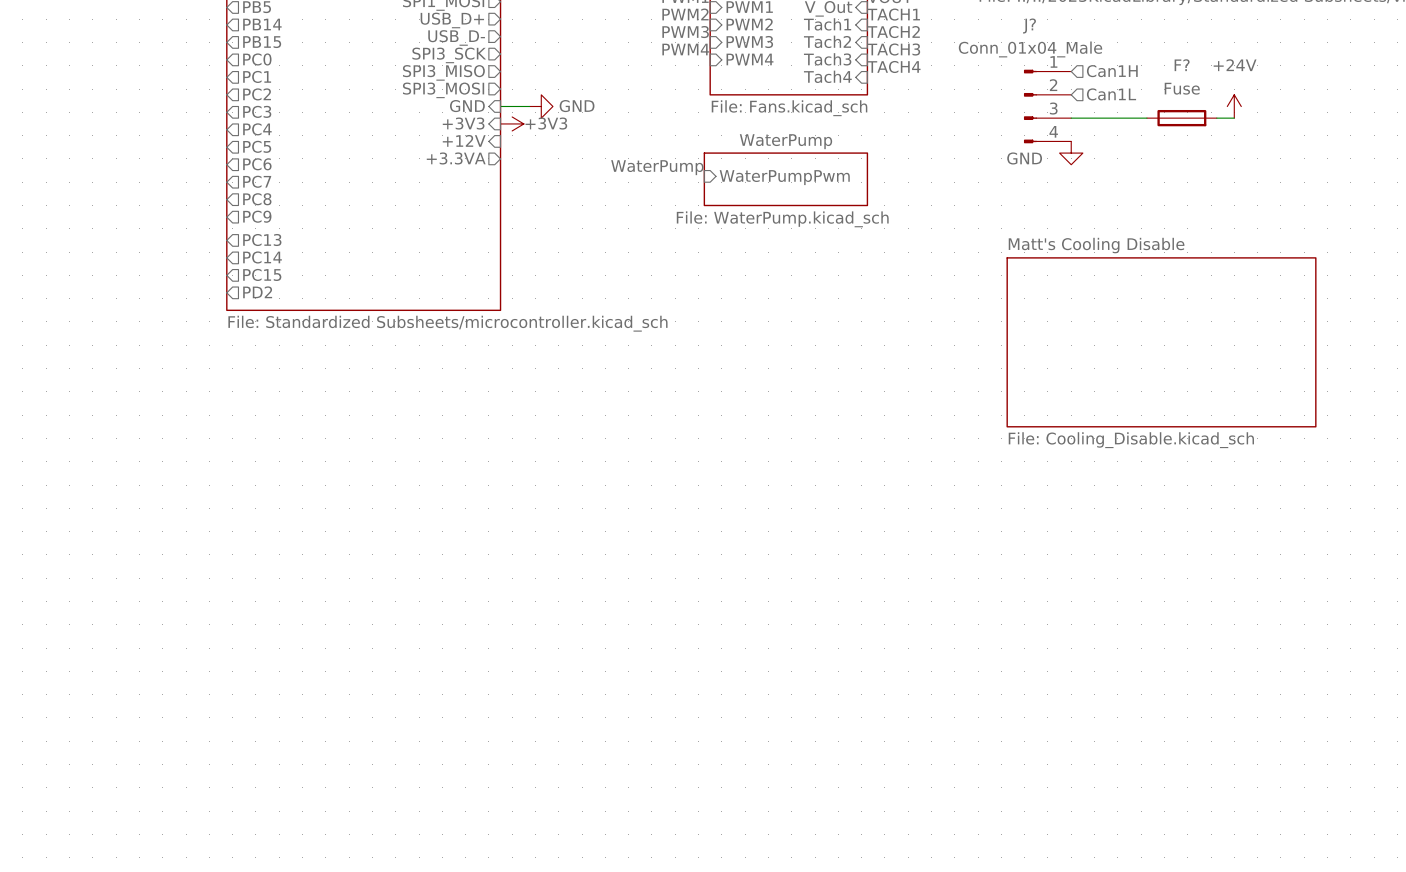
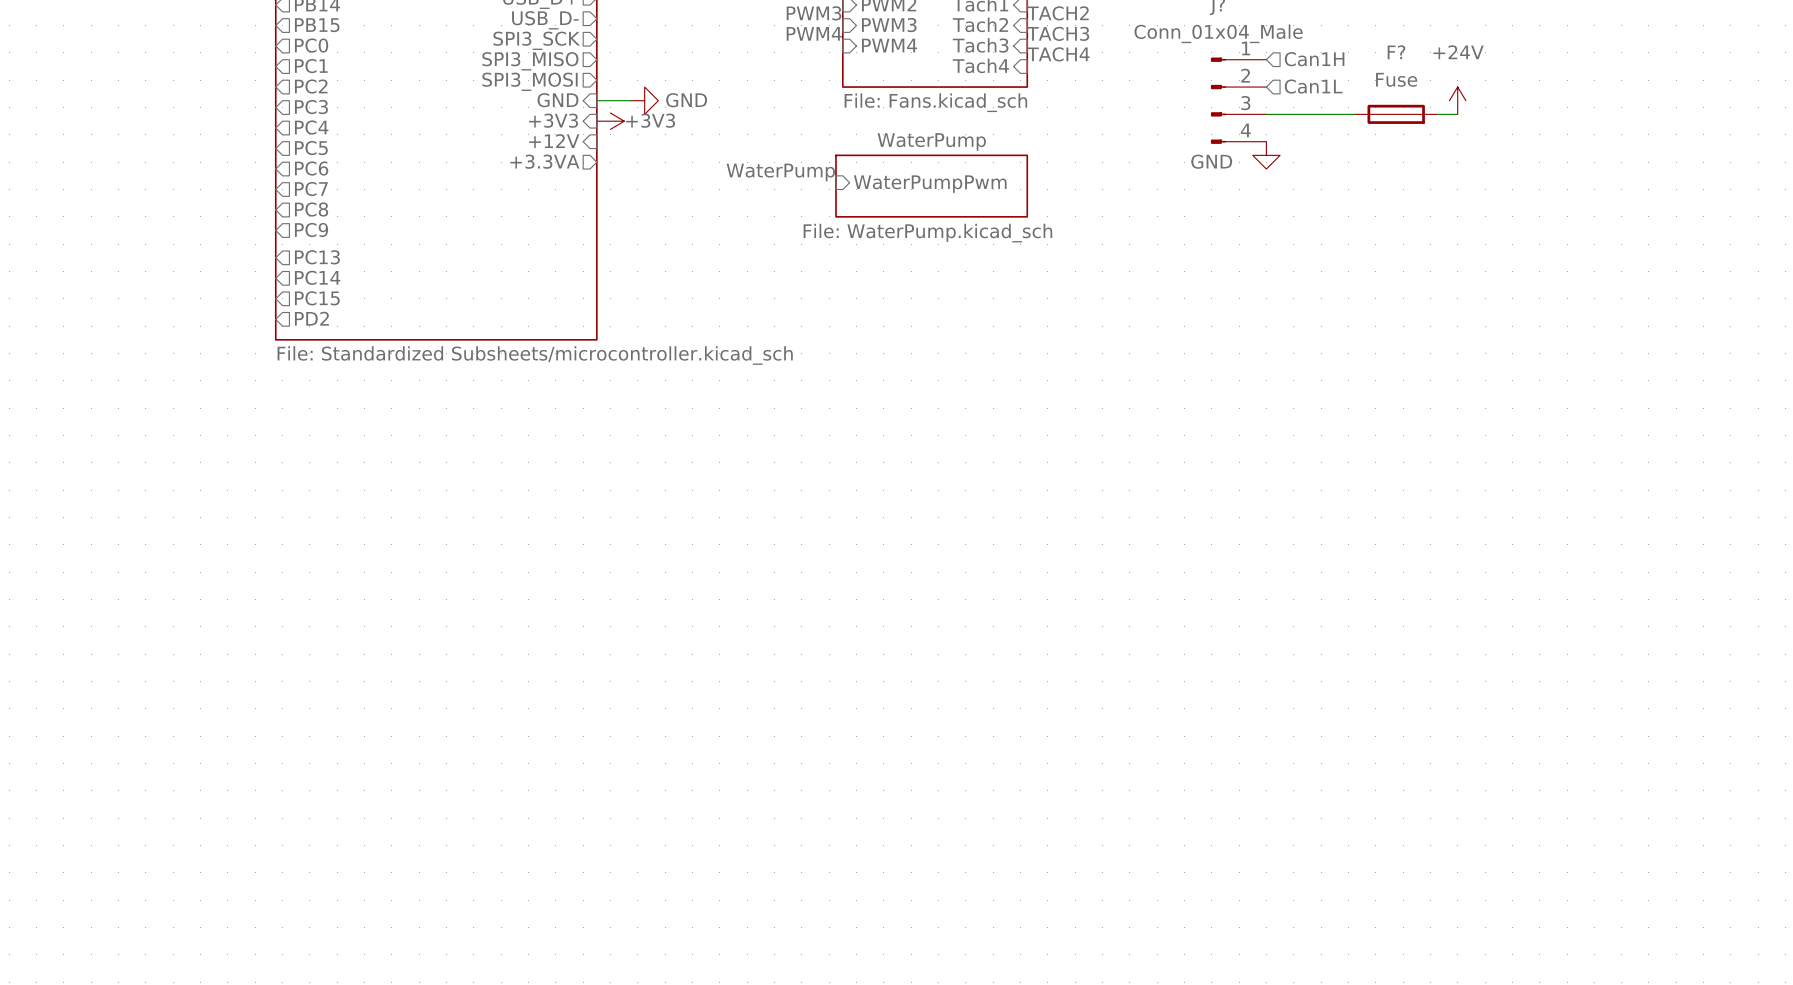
sheet Matt's Cooling Disable: File: Cooling_Disable.kicad_sch (1161, 342) -> none

